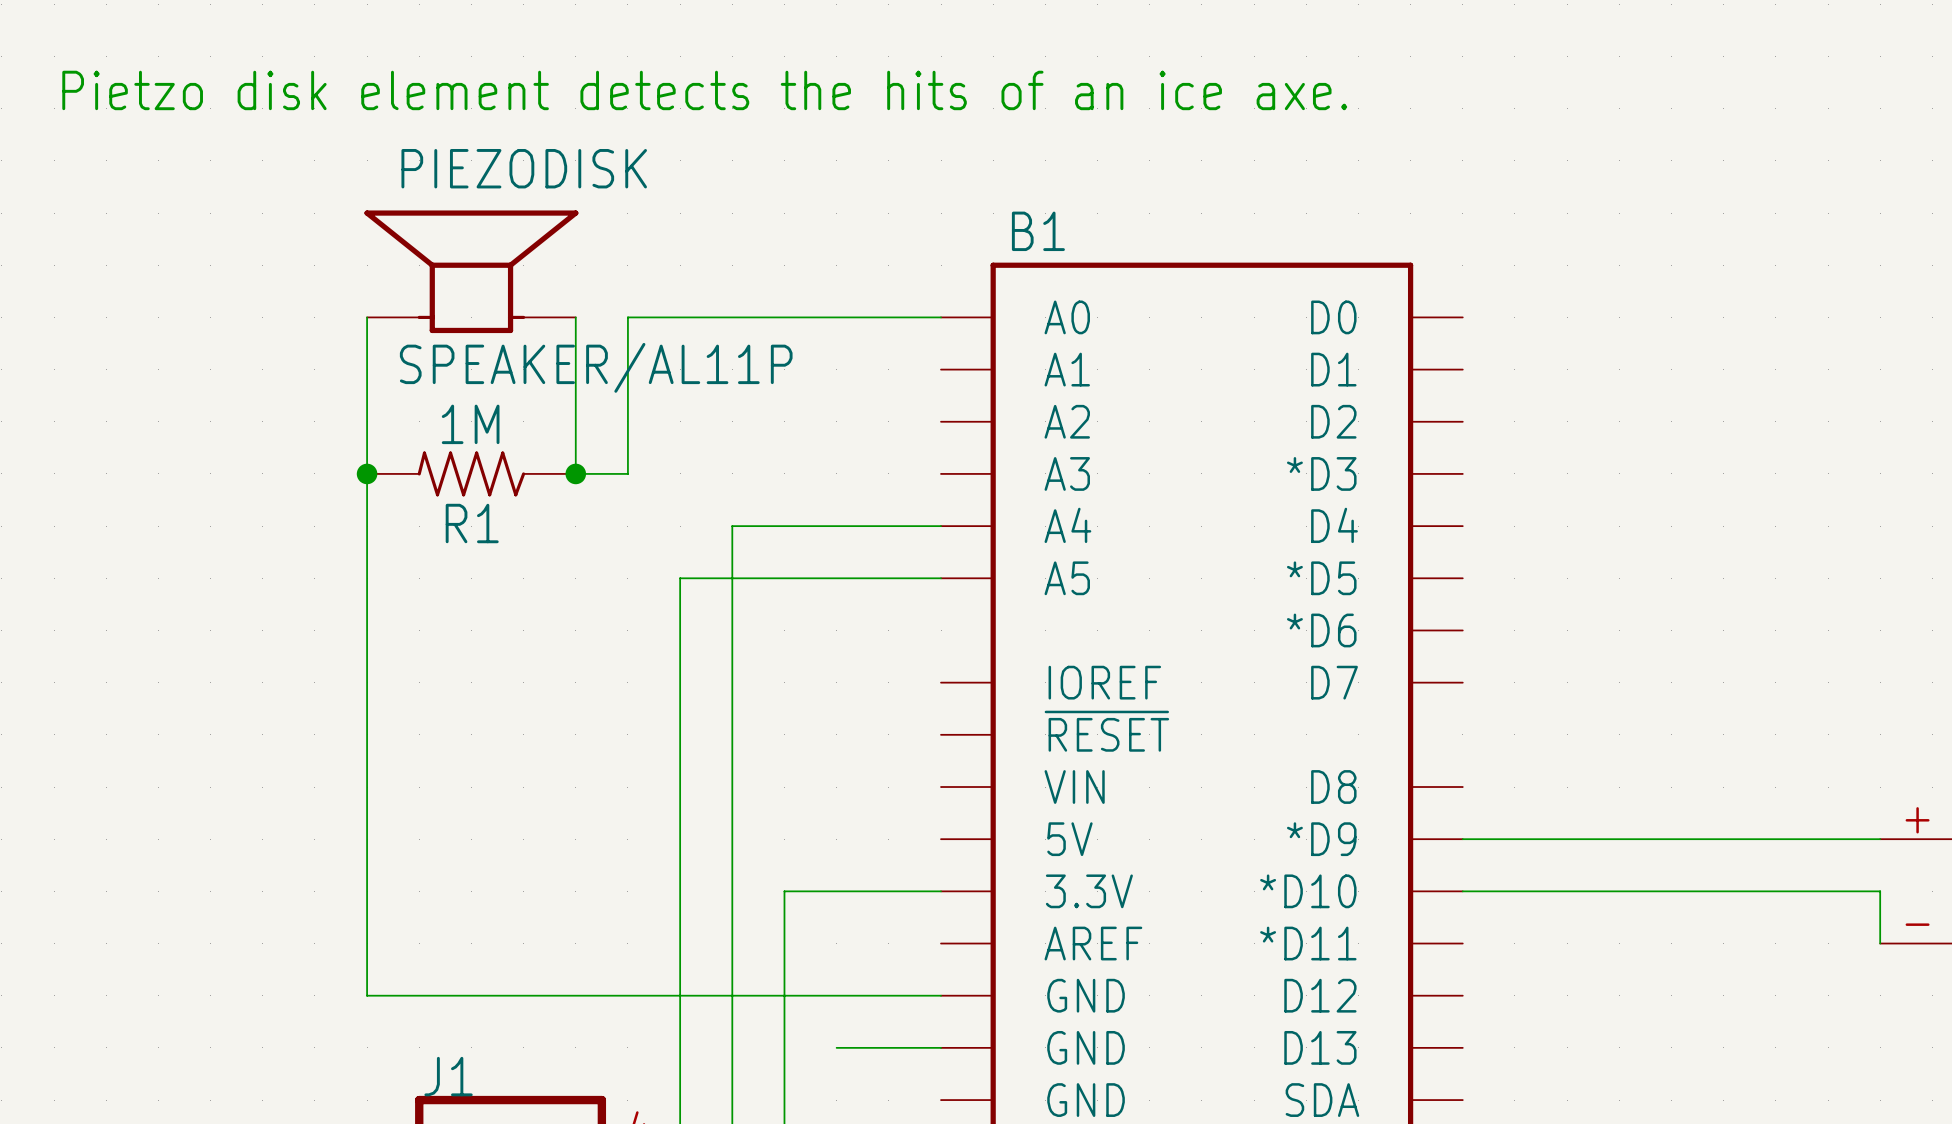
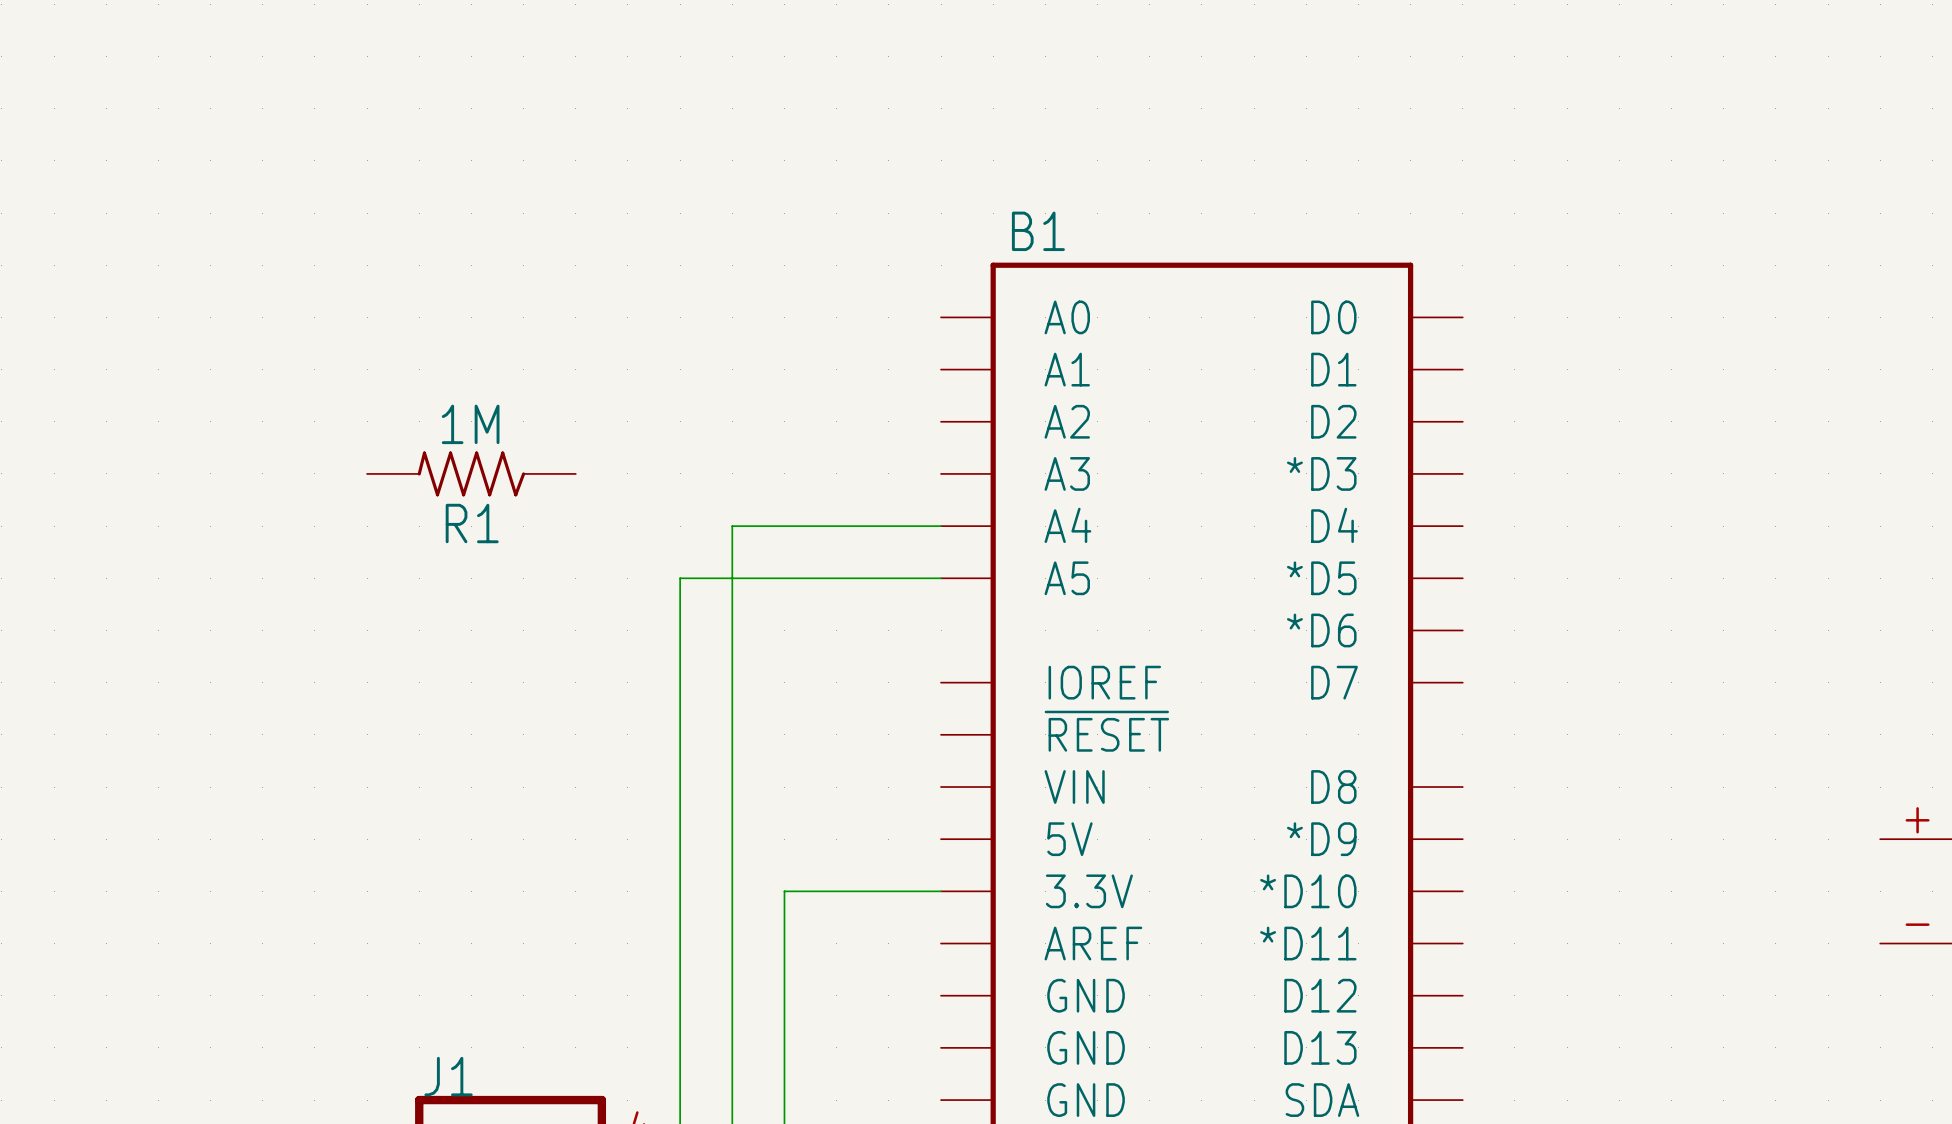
text: Pietzo disk element detects the hits of an ice axe. (704, 90) -> none
PIEZODISK: SPEAKER/AL11P (471, 271) -> none
wire: (367, 317) (367, 995) (941, 995) -> none
wire: (575, 317) (575, 473) (627, 473) (627, 317) (941, 317) -> none
junction: (367, 473) -> none
junction: (575, 473) -> none
wire: (1462, 839) (1880, 839) -> none
wire: (1462, 891) (1880, 891) (1880, 943) -> none
wire: (836, 1047) (941, 1047) -> none

